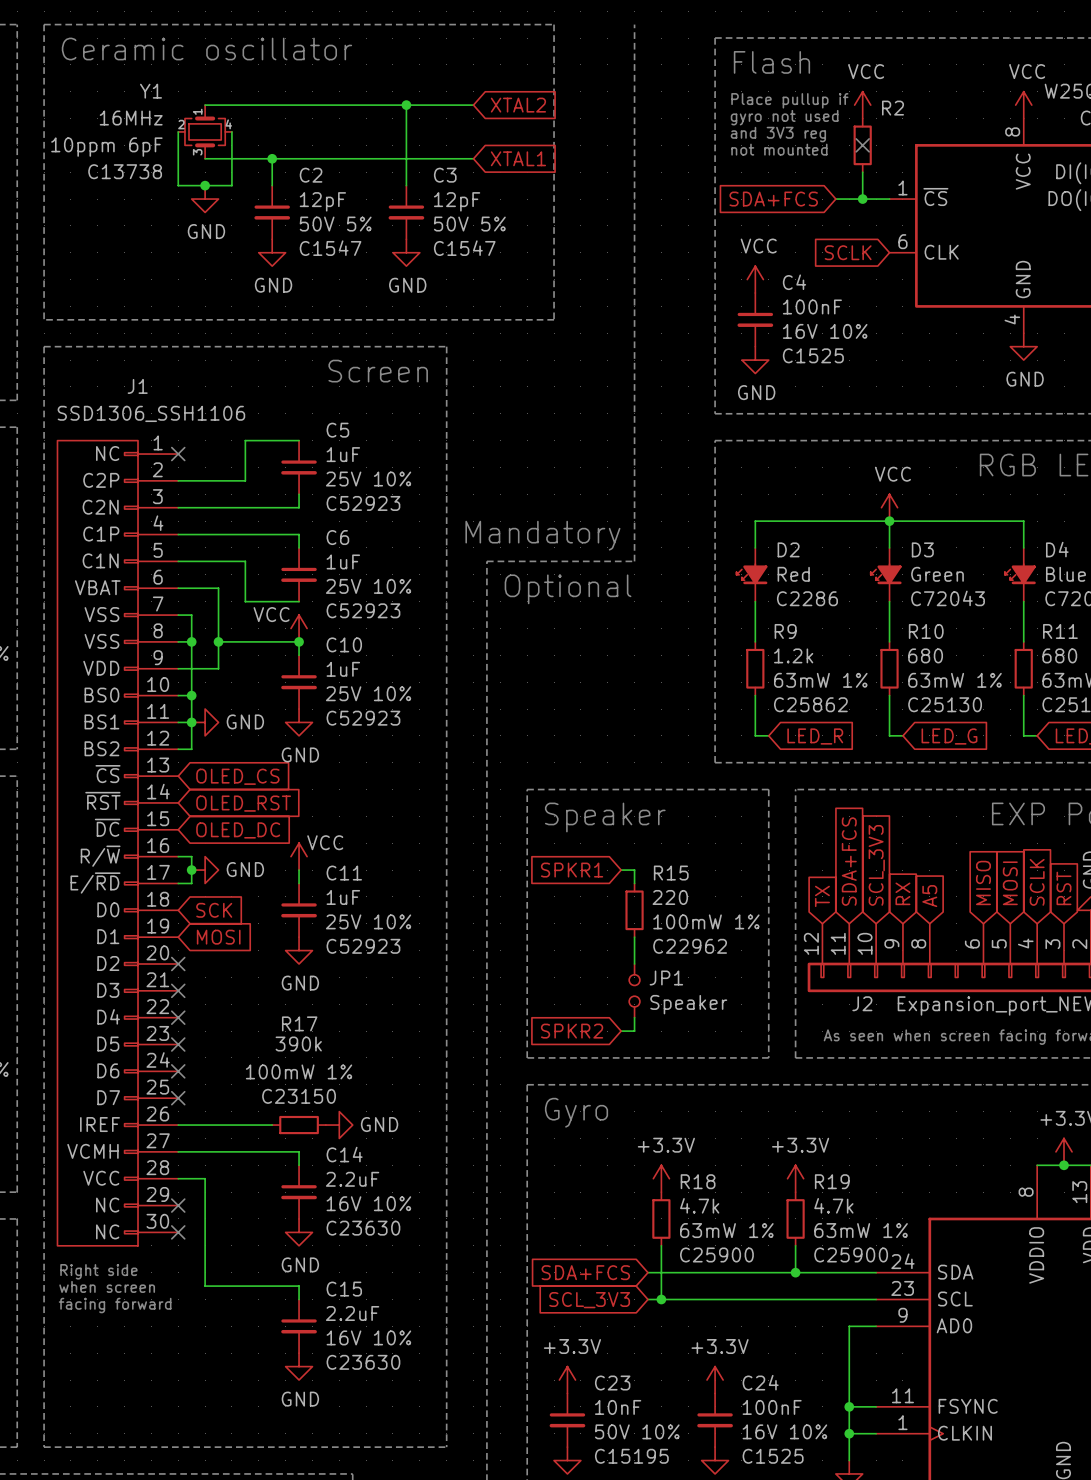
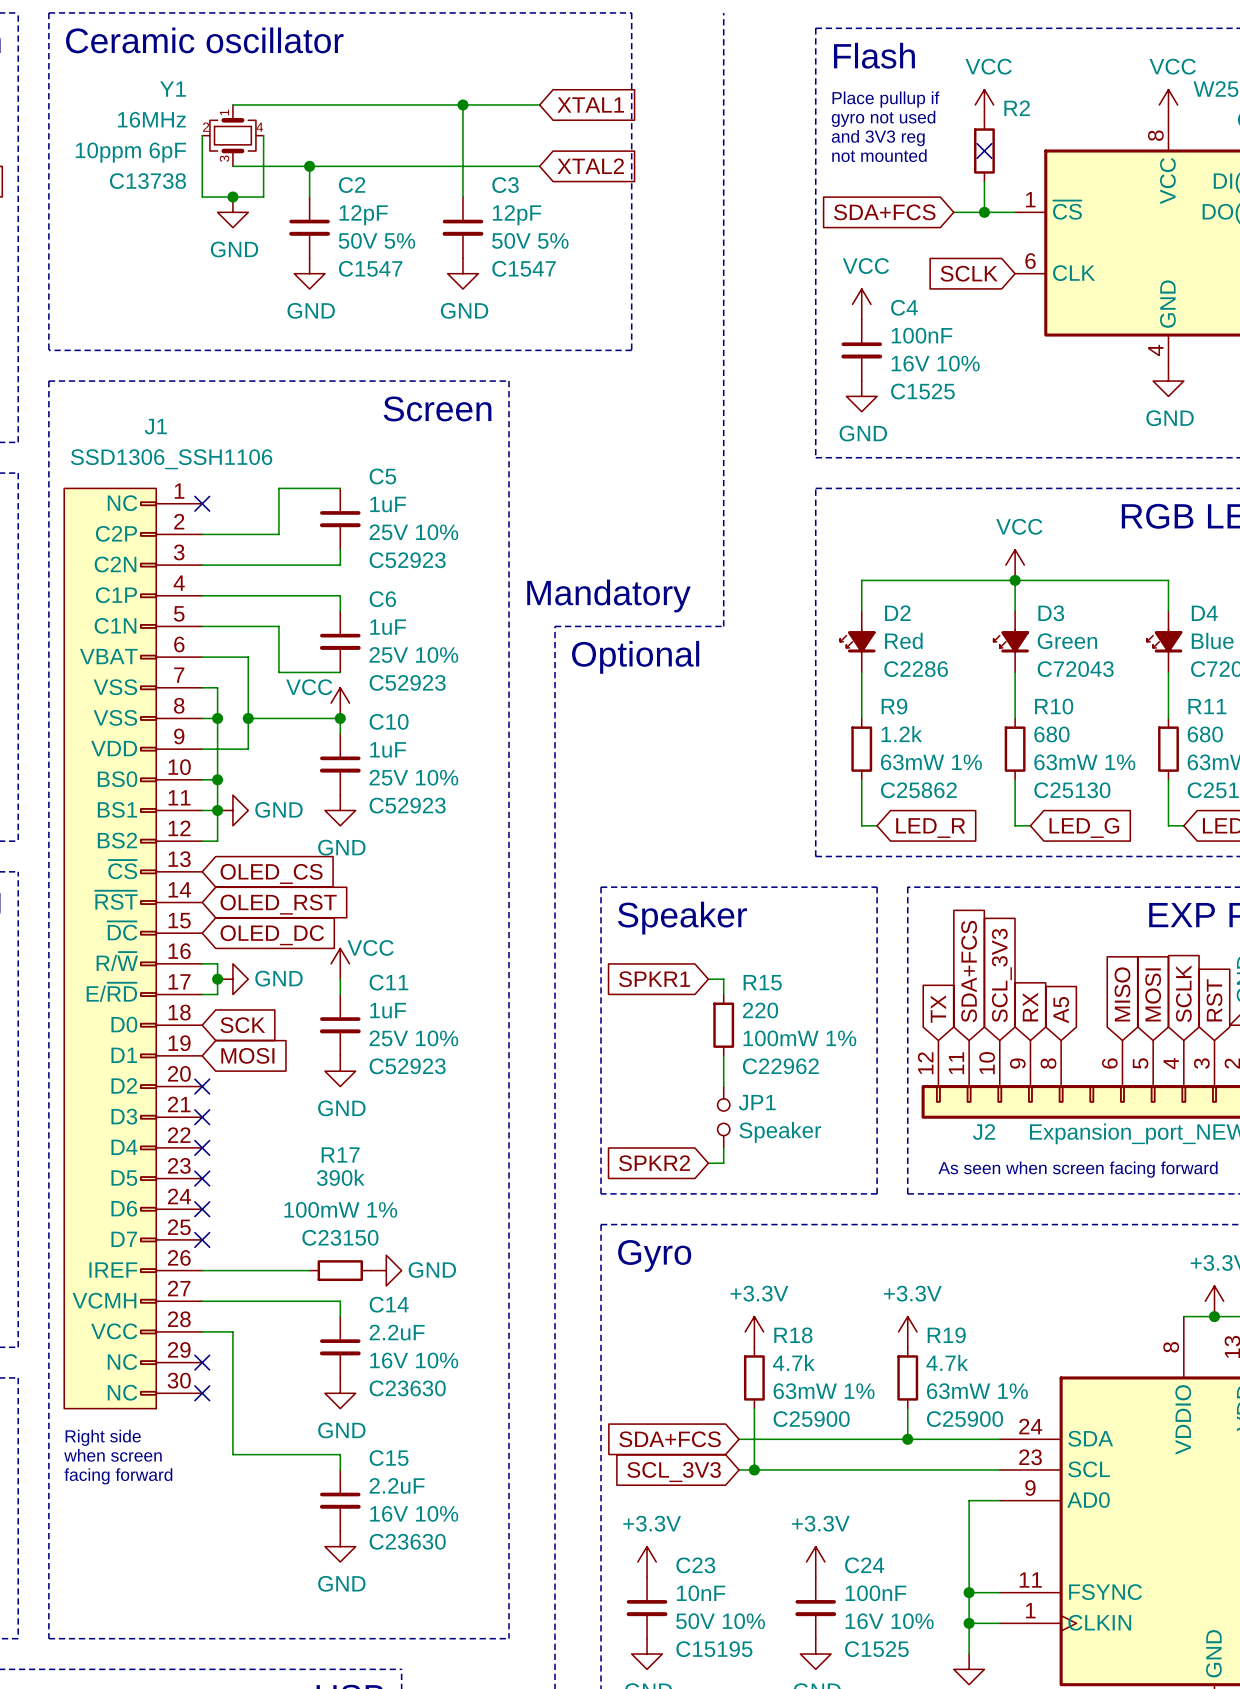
global label: XTAL2 (518, 105) -> XTAL1 (590, 104)
global label: XTAL1 (518, 158) -> XTAL2 (590, 166)

